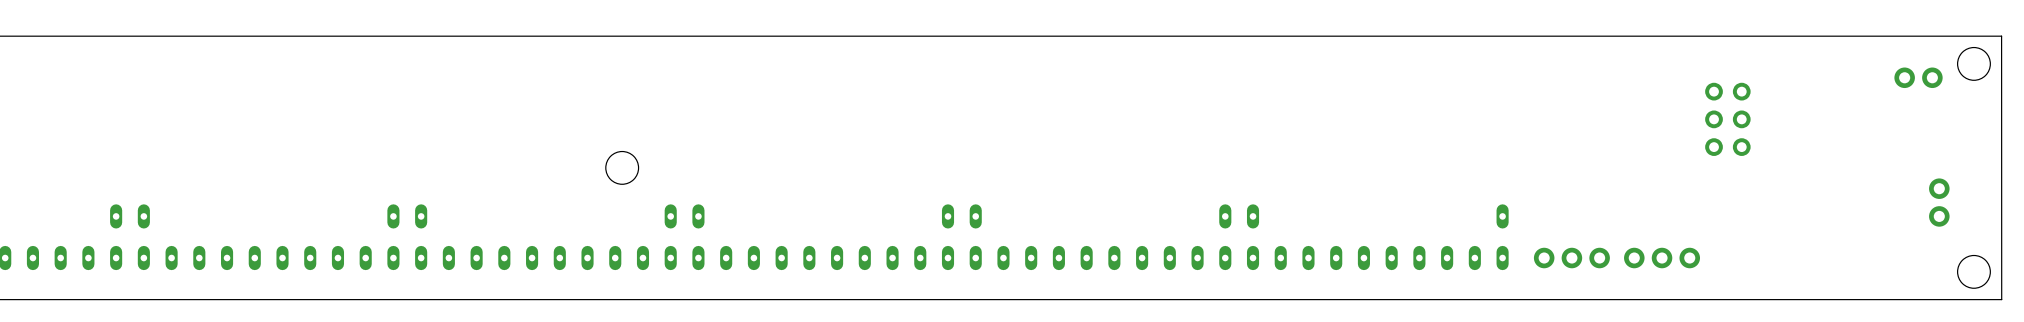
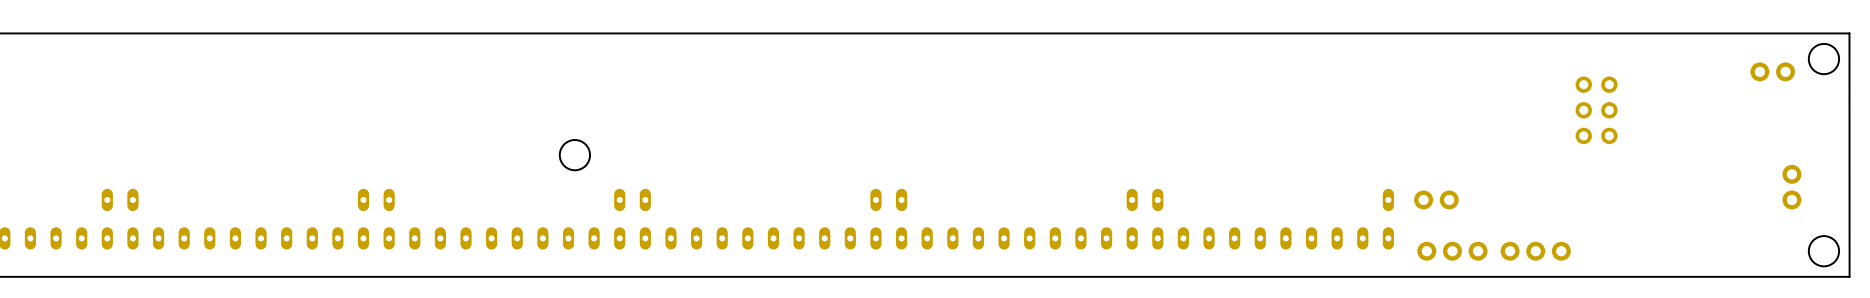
part: none -> (1436, 199)
part position: (1571, 258) -> (1452, 251)
part position: (1662, 258) -> (1535, 251)

